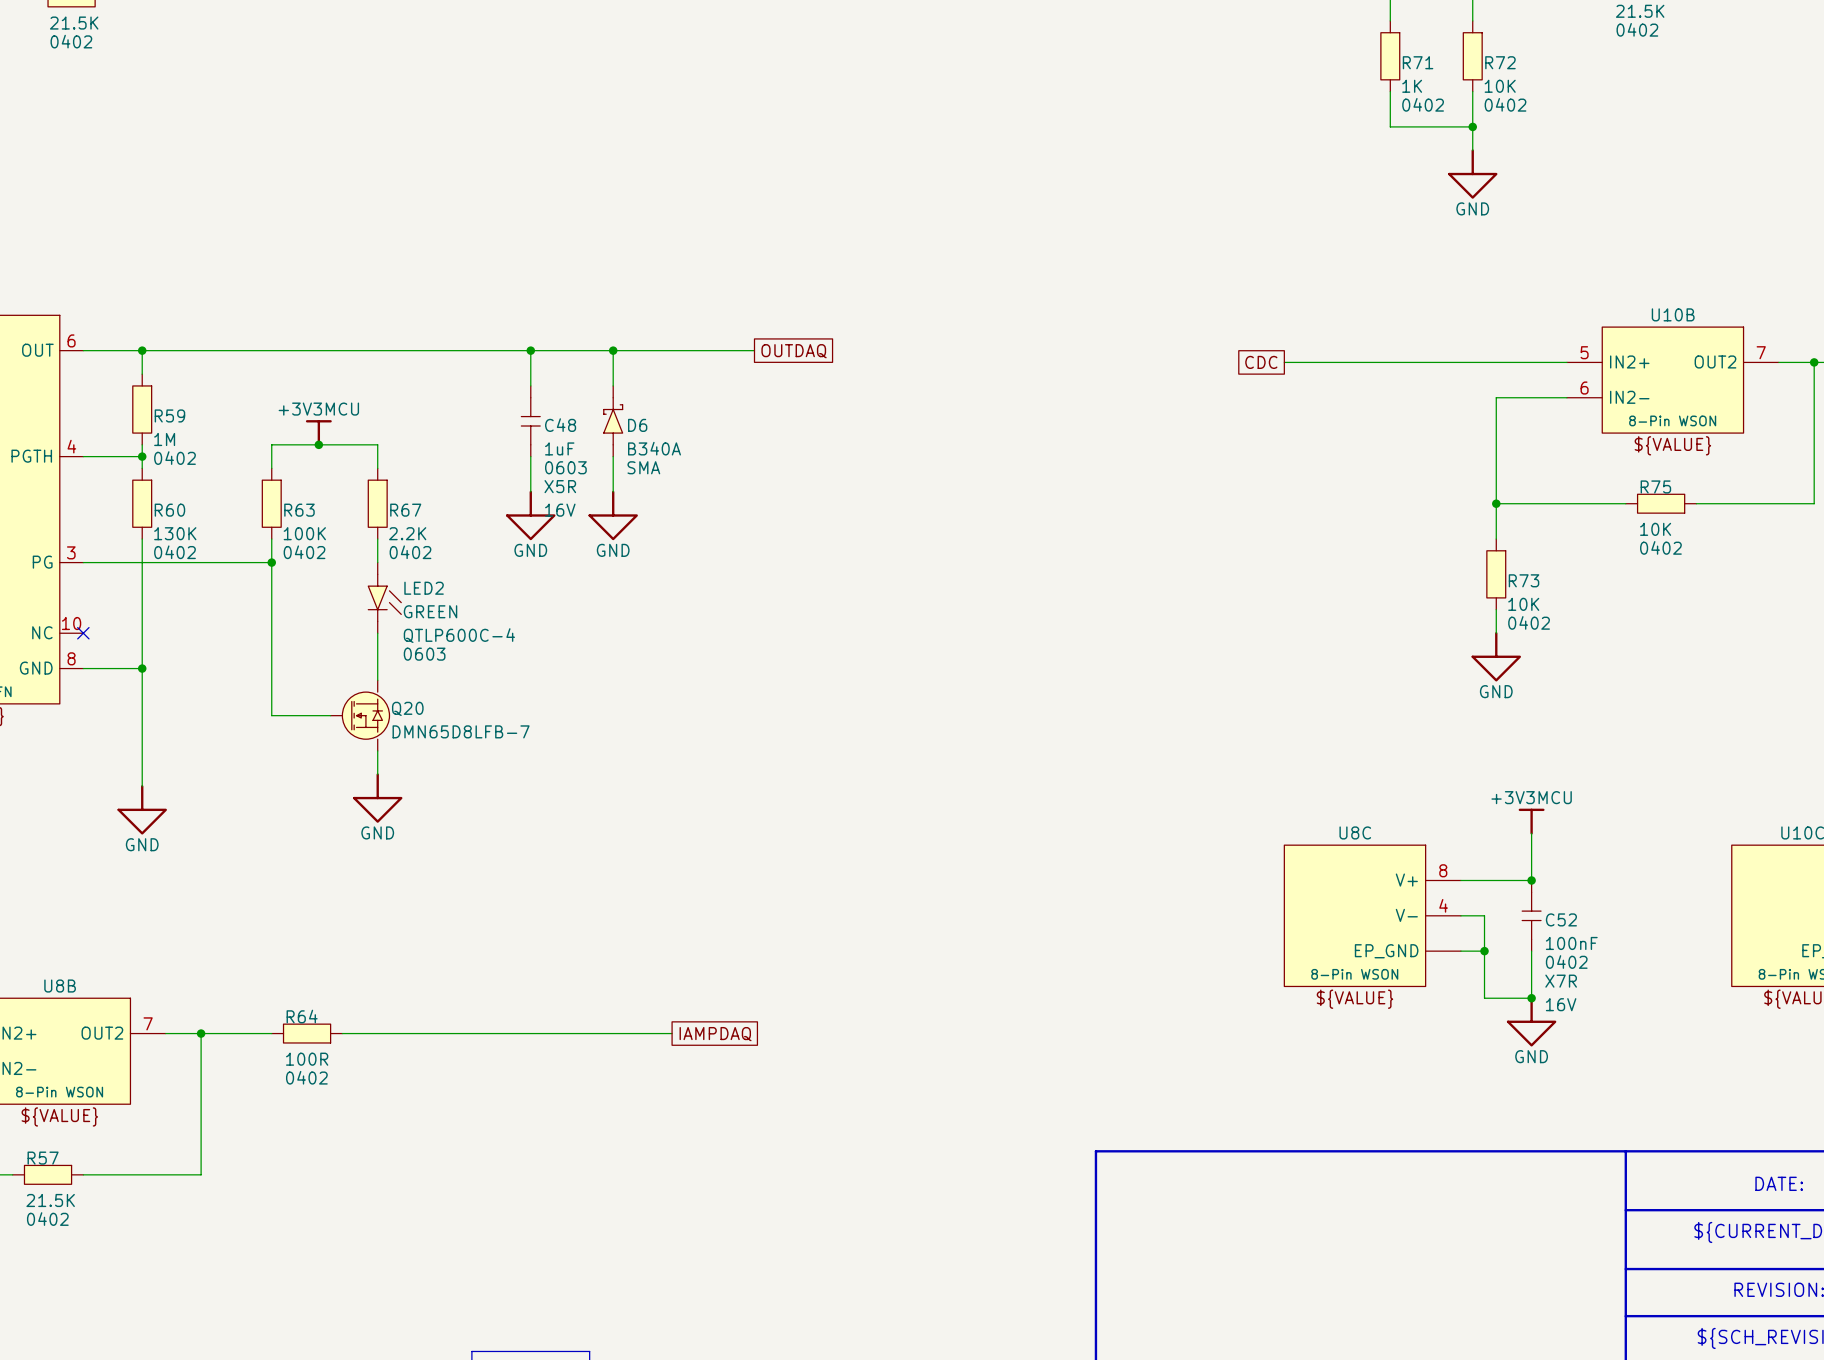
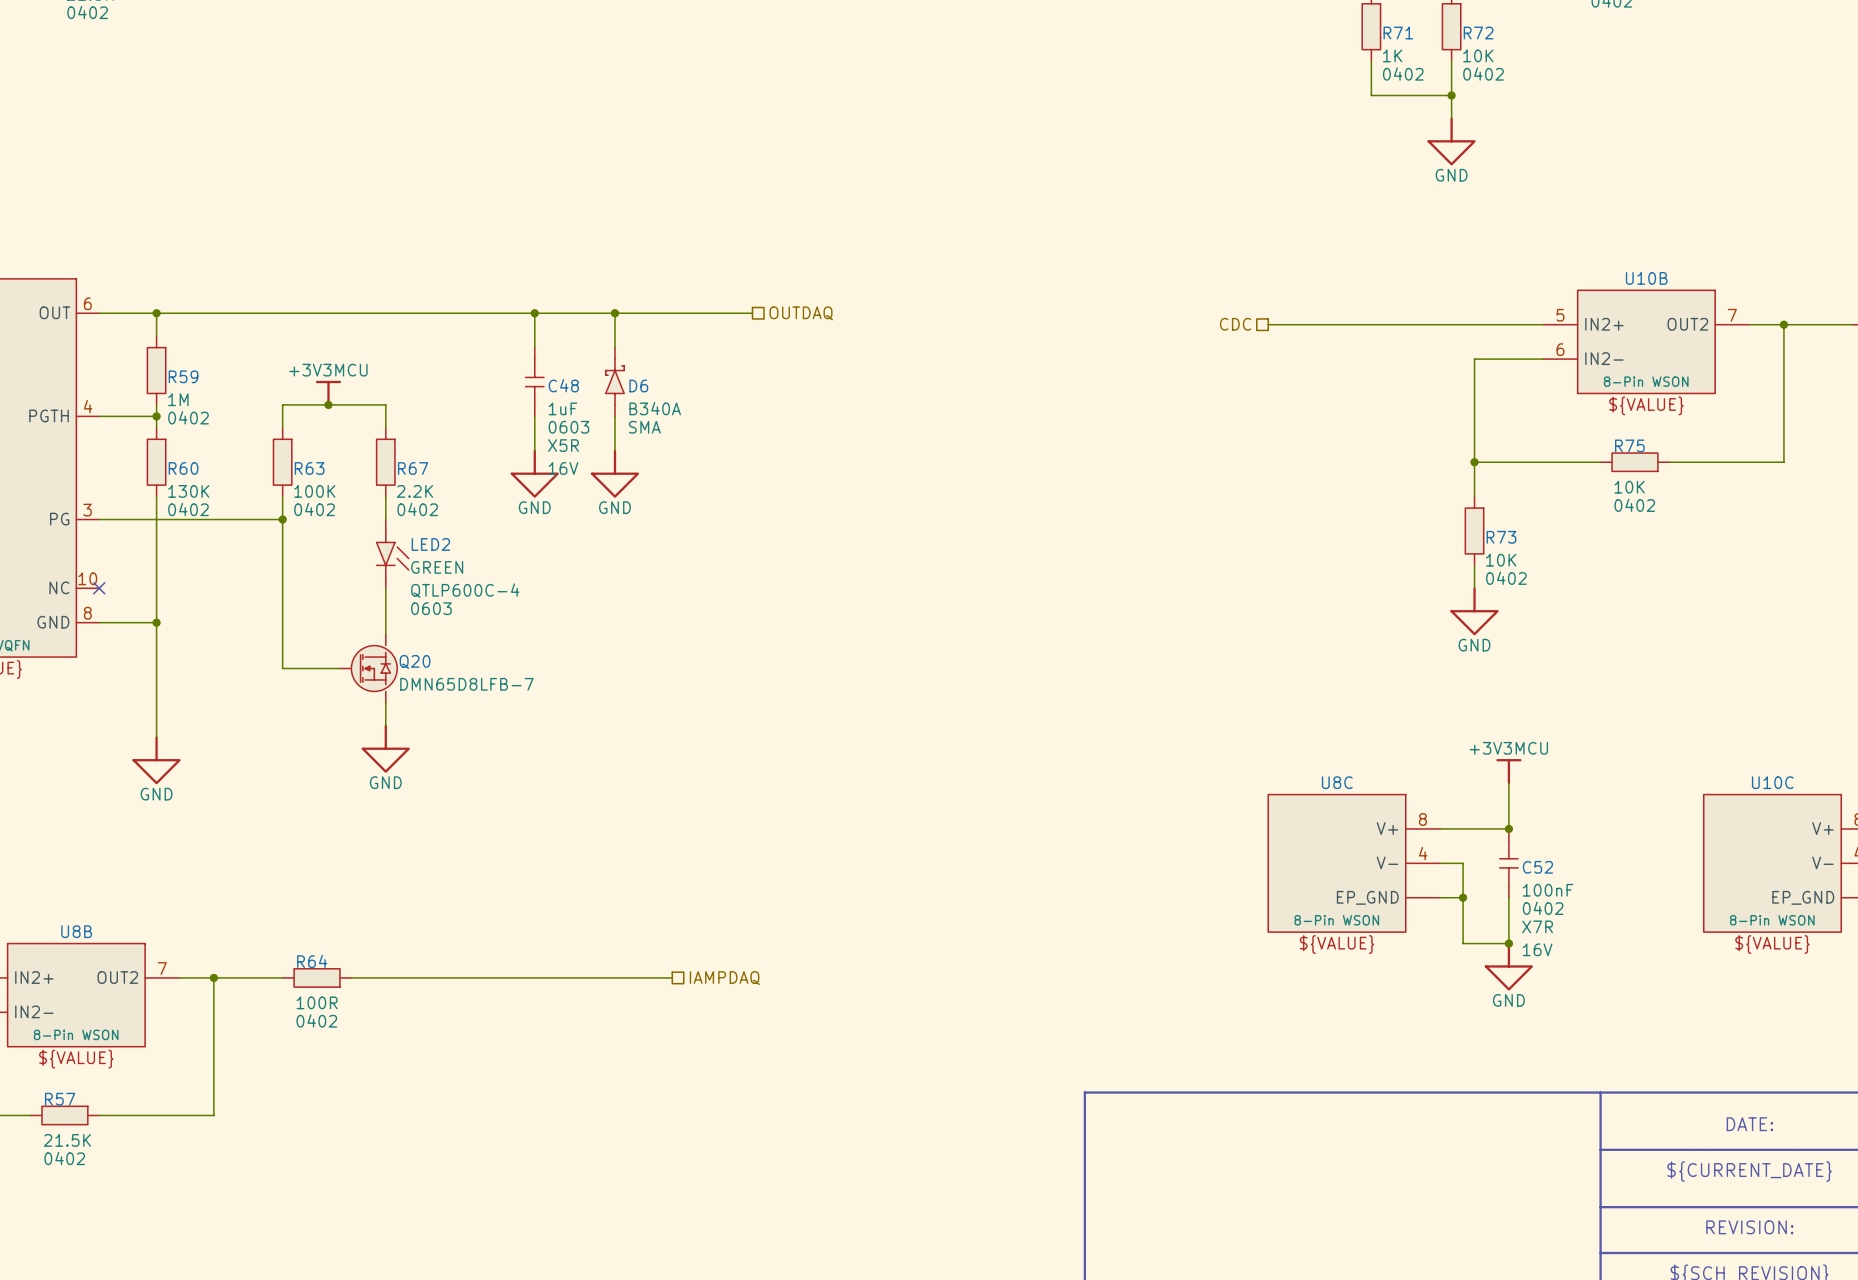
hierarchical label: none -> OUTDAQ (801, 313)
global label: OUTDAQ (794, 351) -> none
hierarchical label: none -> CDC (1235, 324)
global label: CDC (1261, 362) -> none
hierarchical label: none -> IAMPDAQ (724, 978)
global label: IAMPDAQ (715, 1034) -> none

